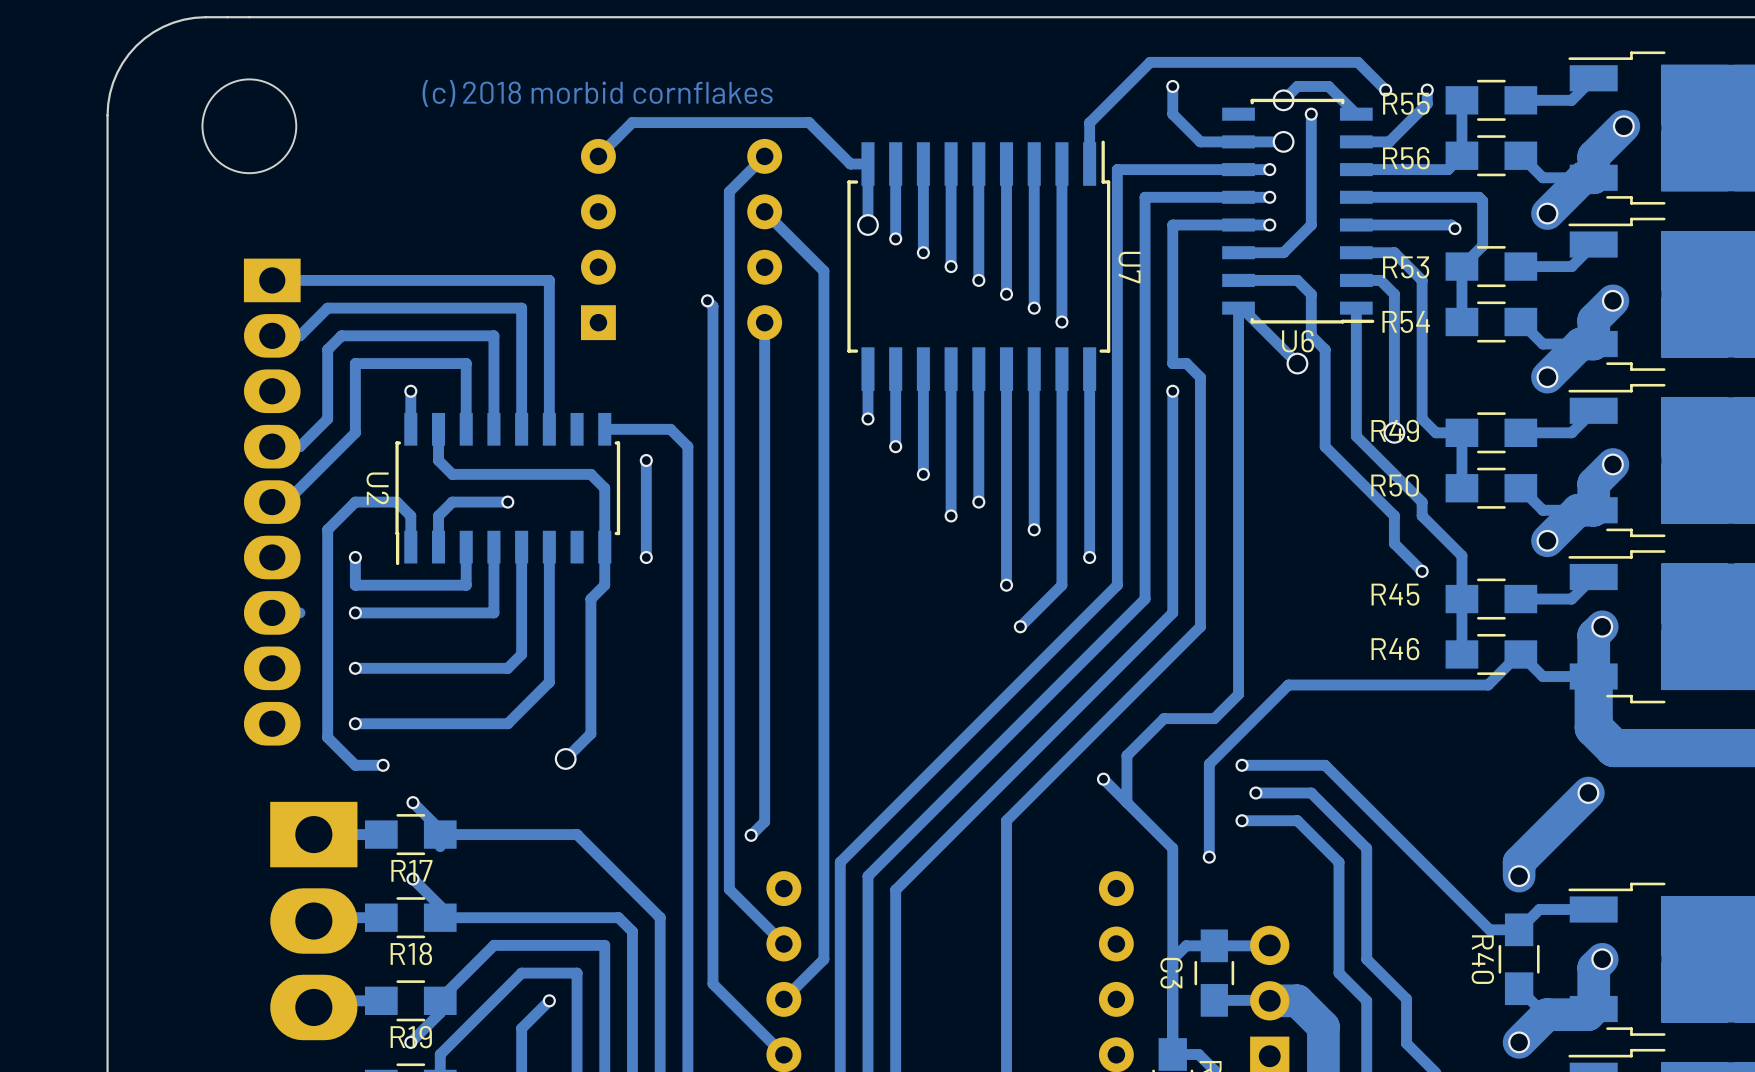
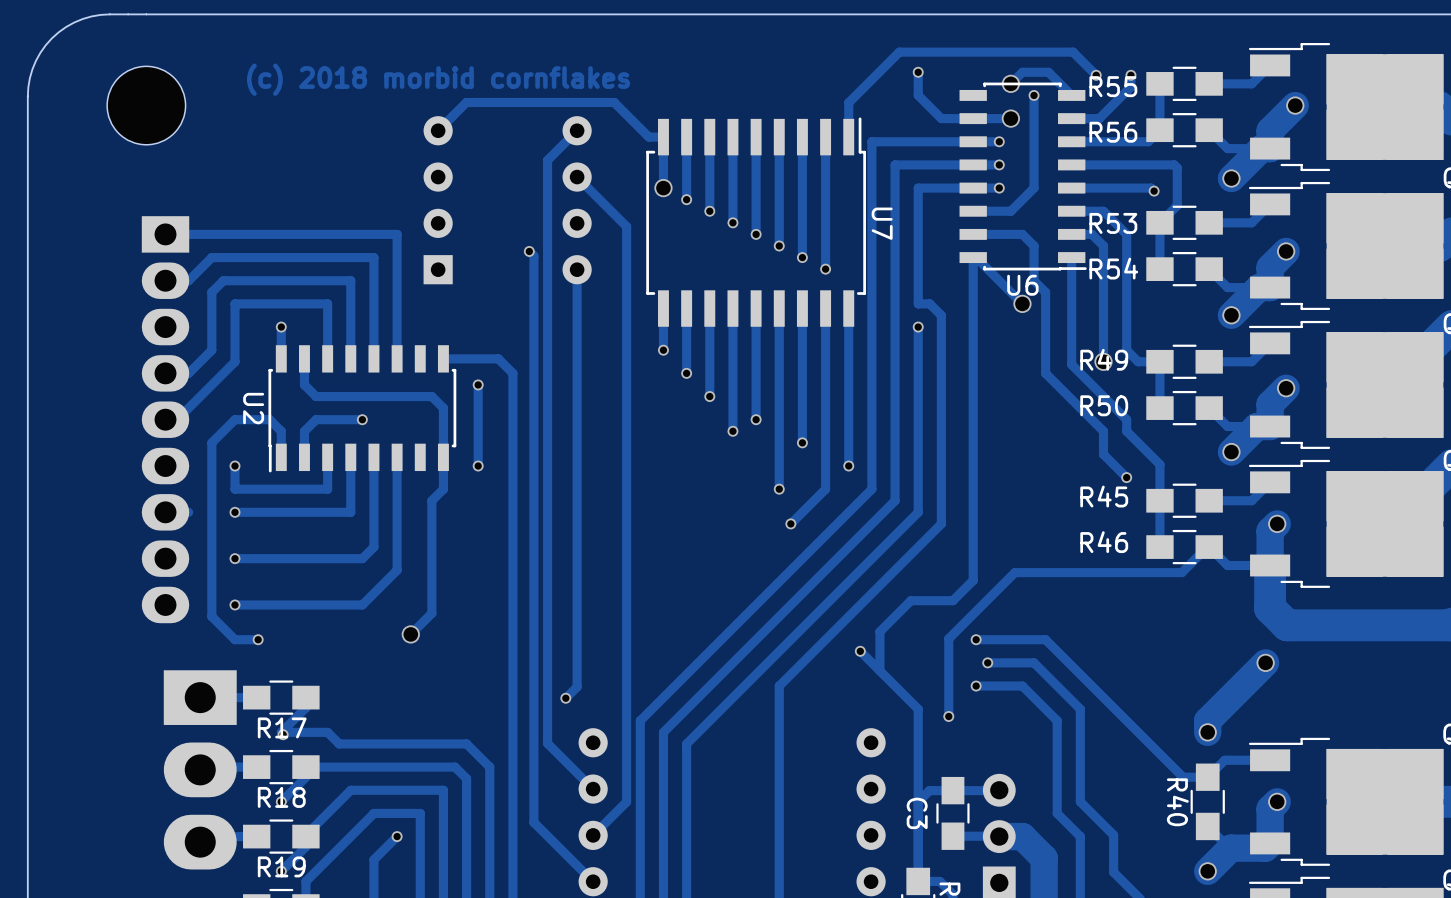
track: (412, 802) (440, 829) (440, 834) (577, 834) (632, 889) -> (305, 707) (281, 732) (327, 732) (339, 743) (466, 743)
via: (412, 802) -> none
track: (412, 878) (440, 906) (440, 917) -> (281, 801) (305, 777) (305, 767)
via: none -> (281, 801)

